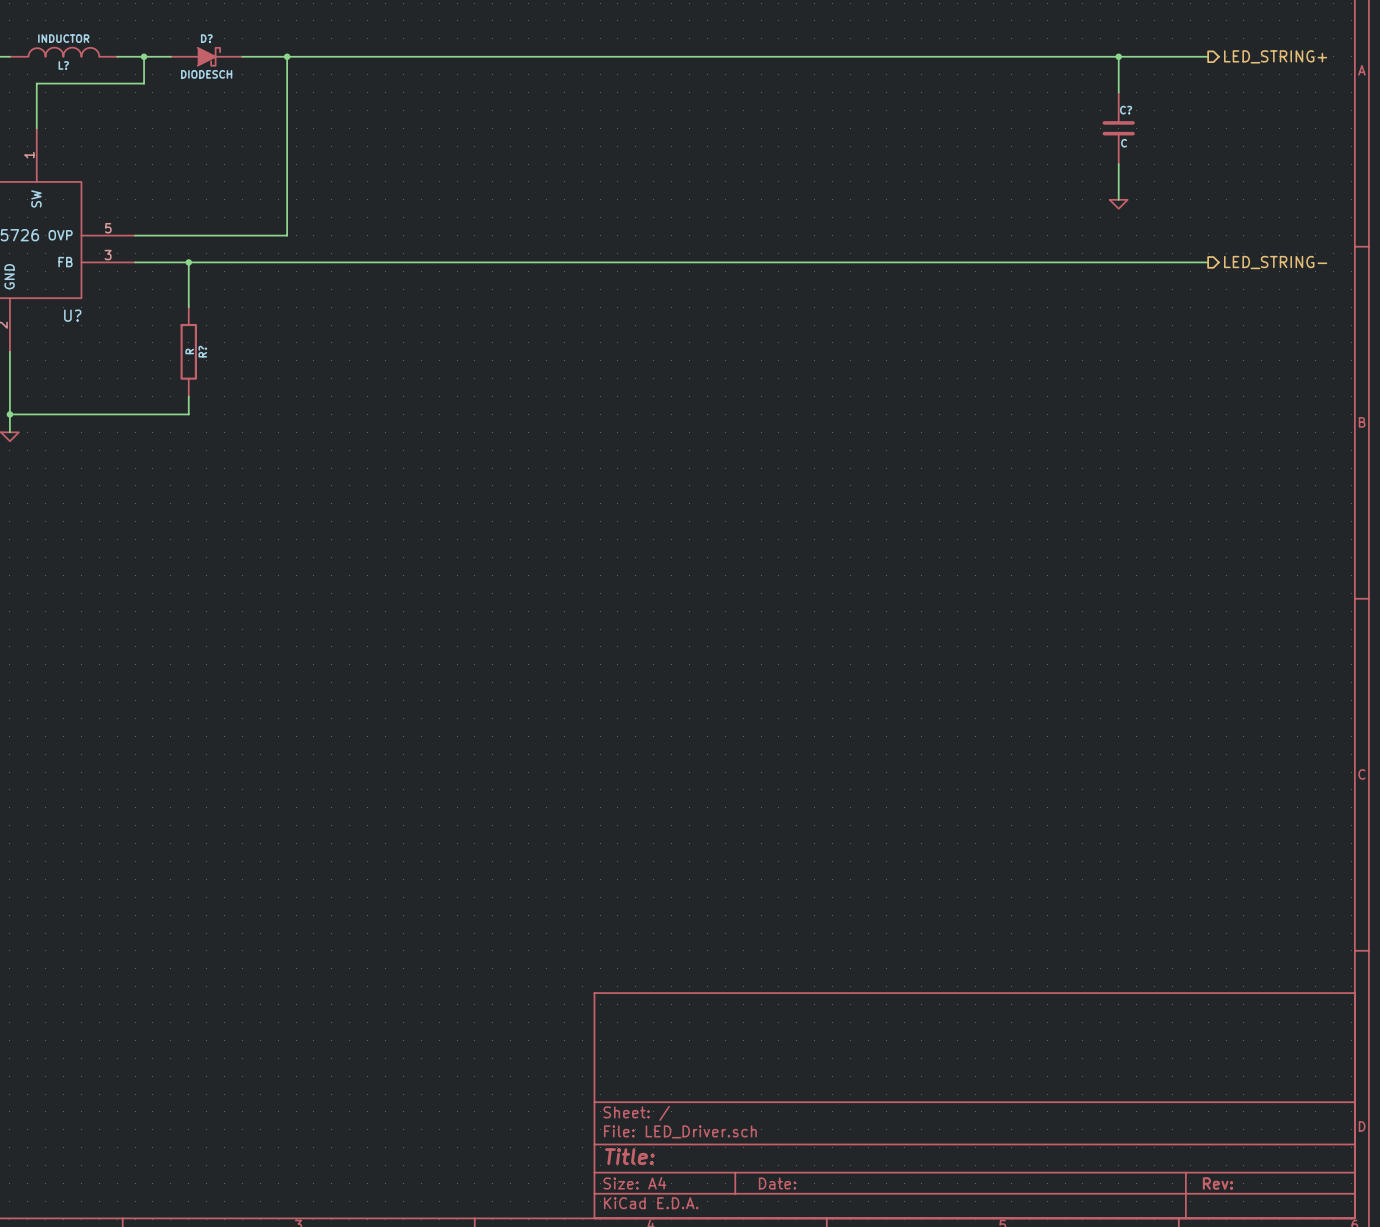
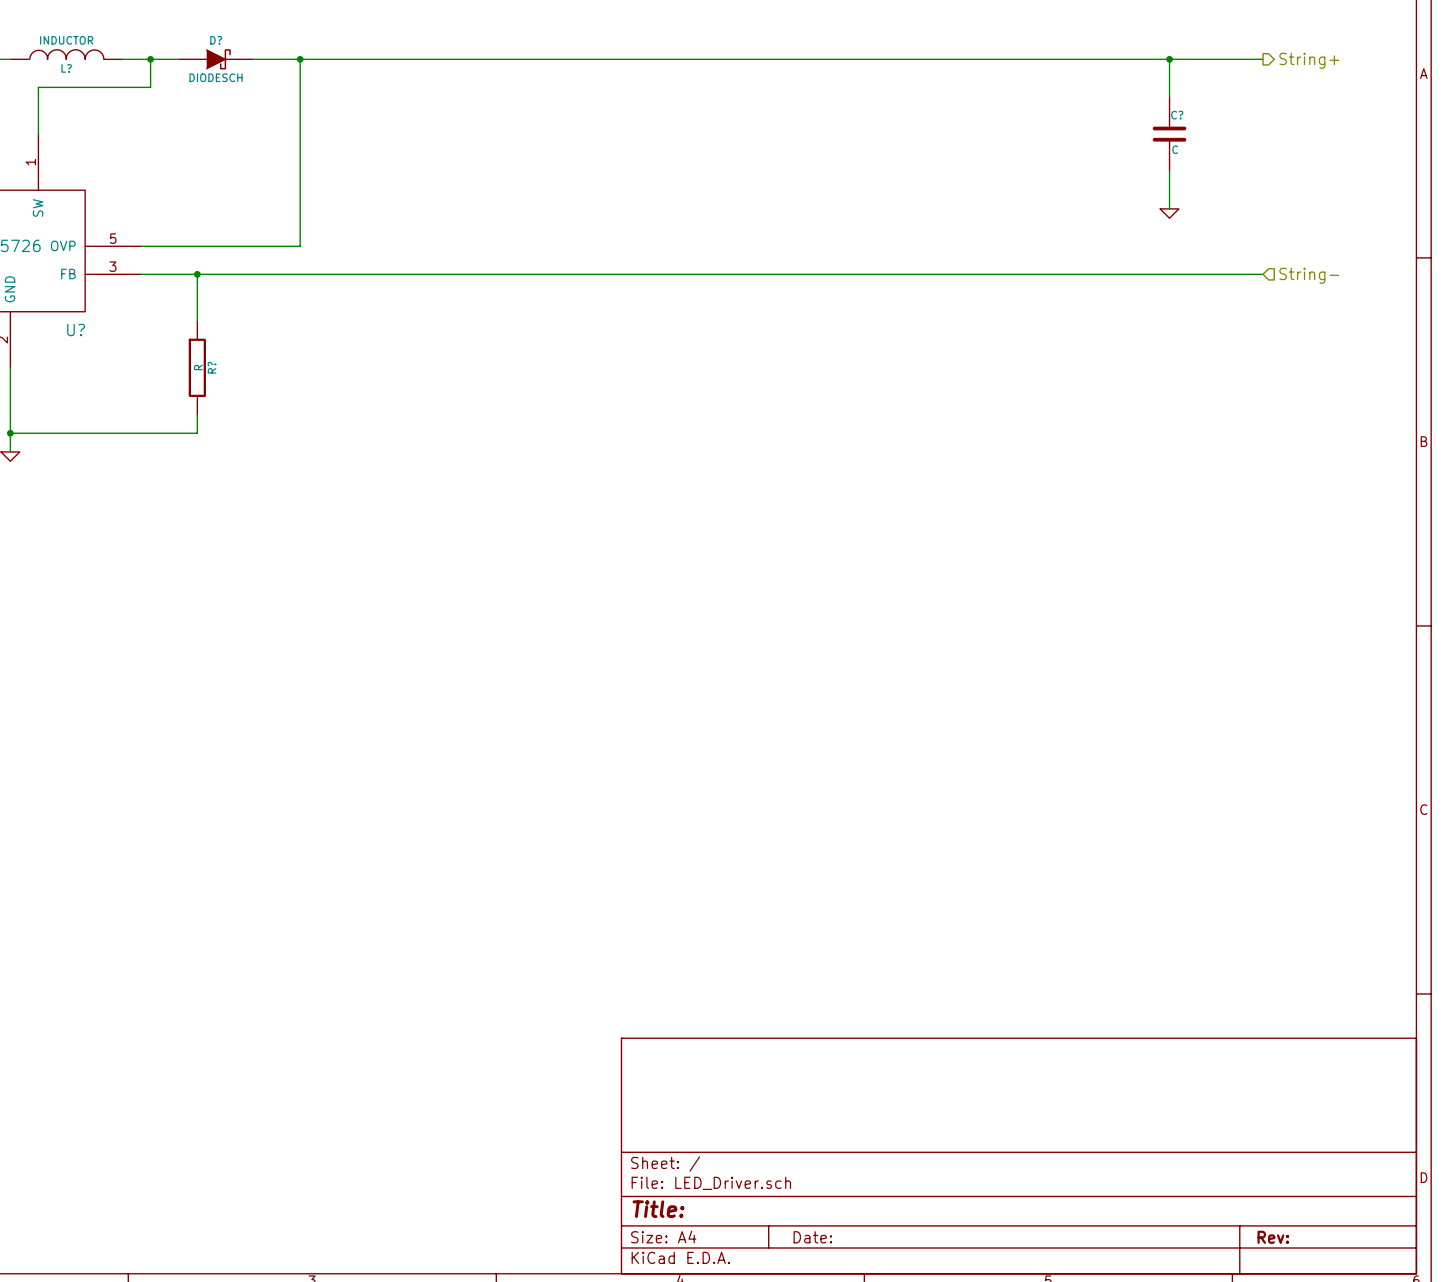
hierarchical label: LED_STRING+ (1275, 56) -> String+ (1309, 60)
hierarchical label shape: output (1275, 262) -> input (1309, 275)
hierarchical label: LED_STRING- (1275, 262) -> String- (1309, 275)

